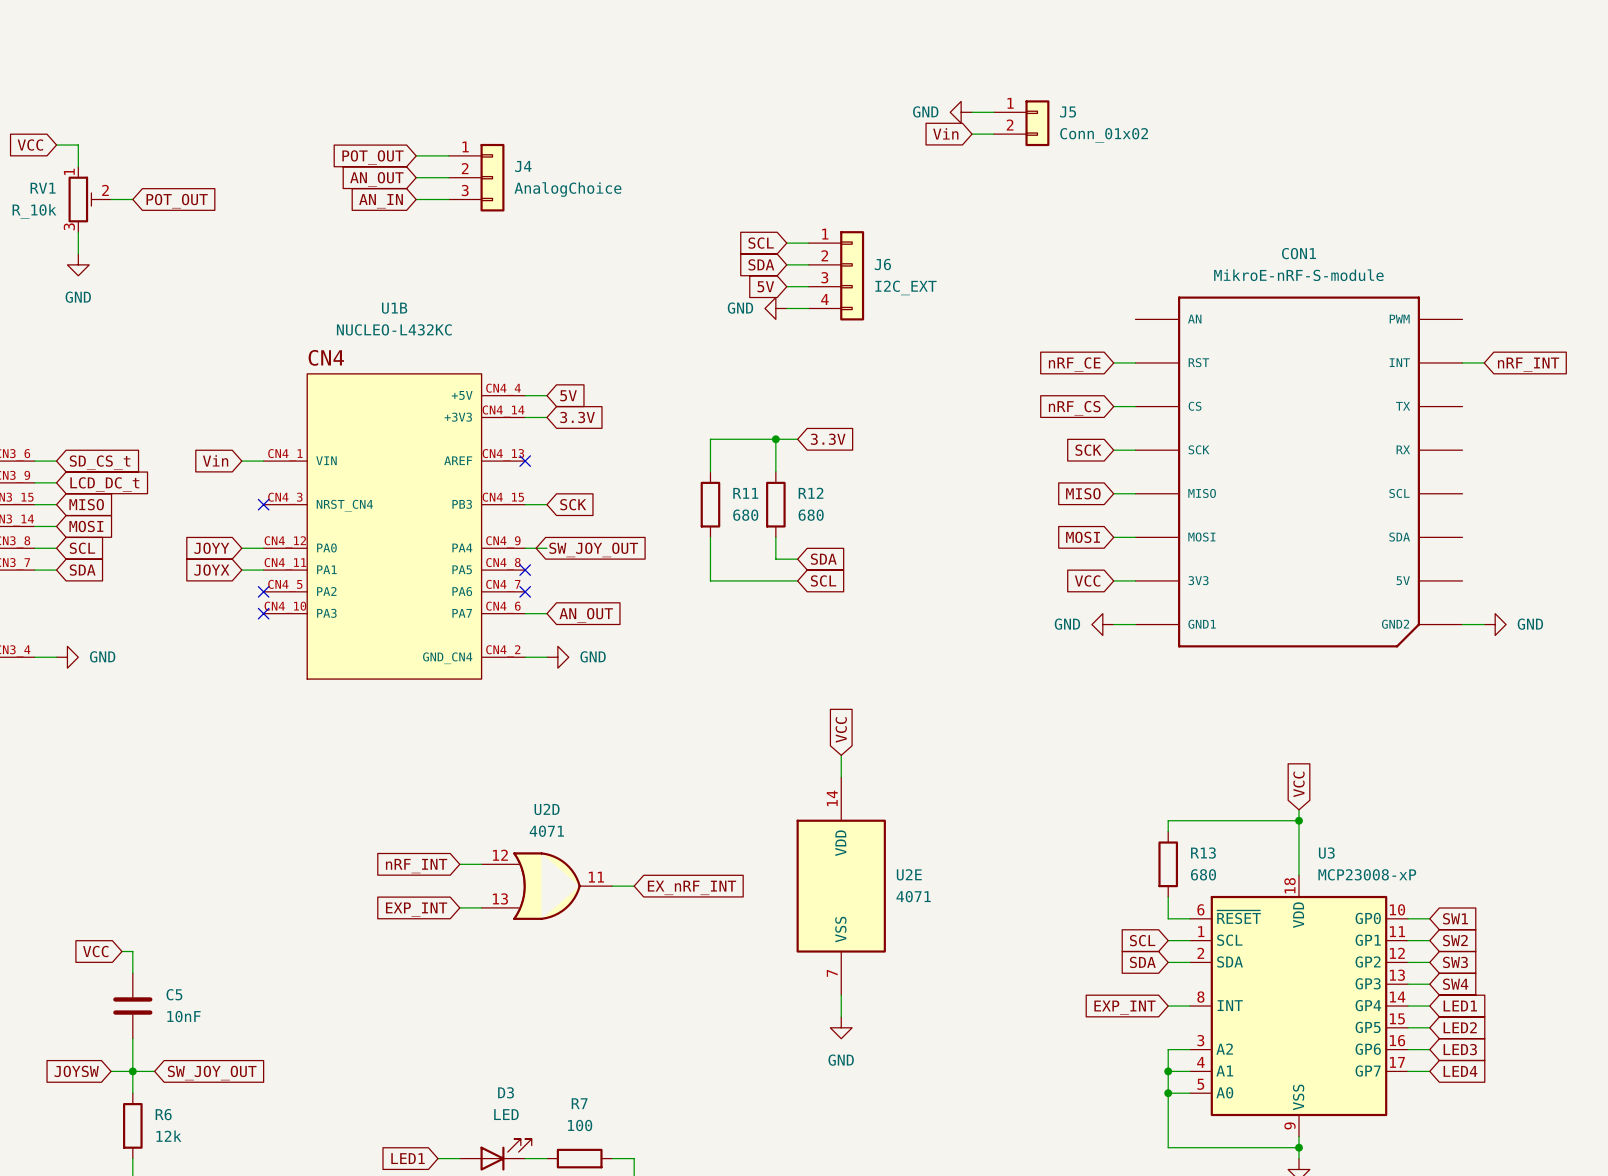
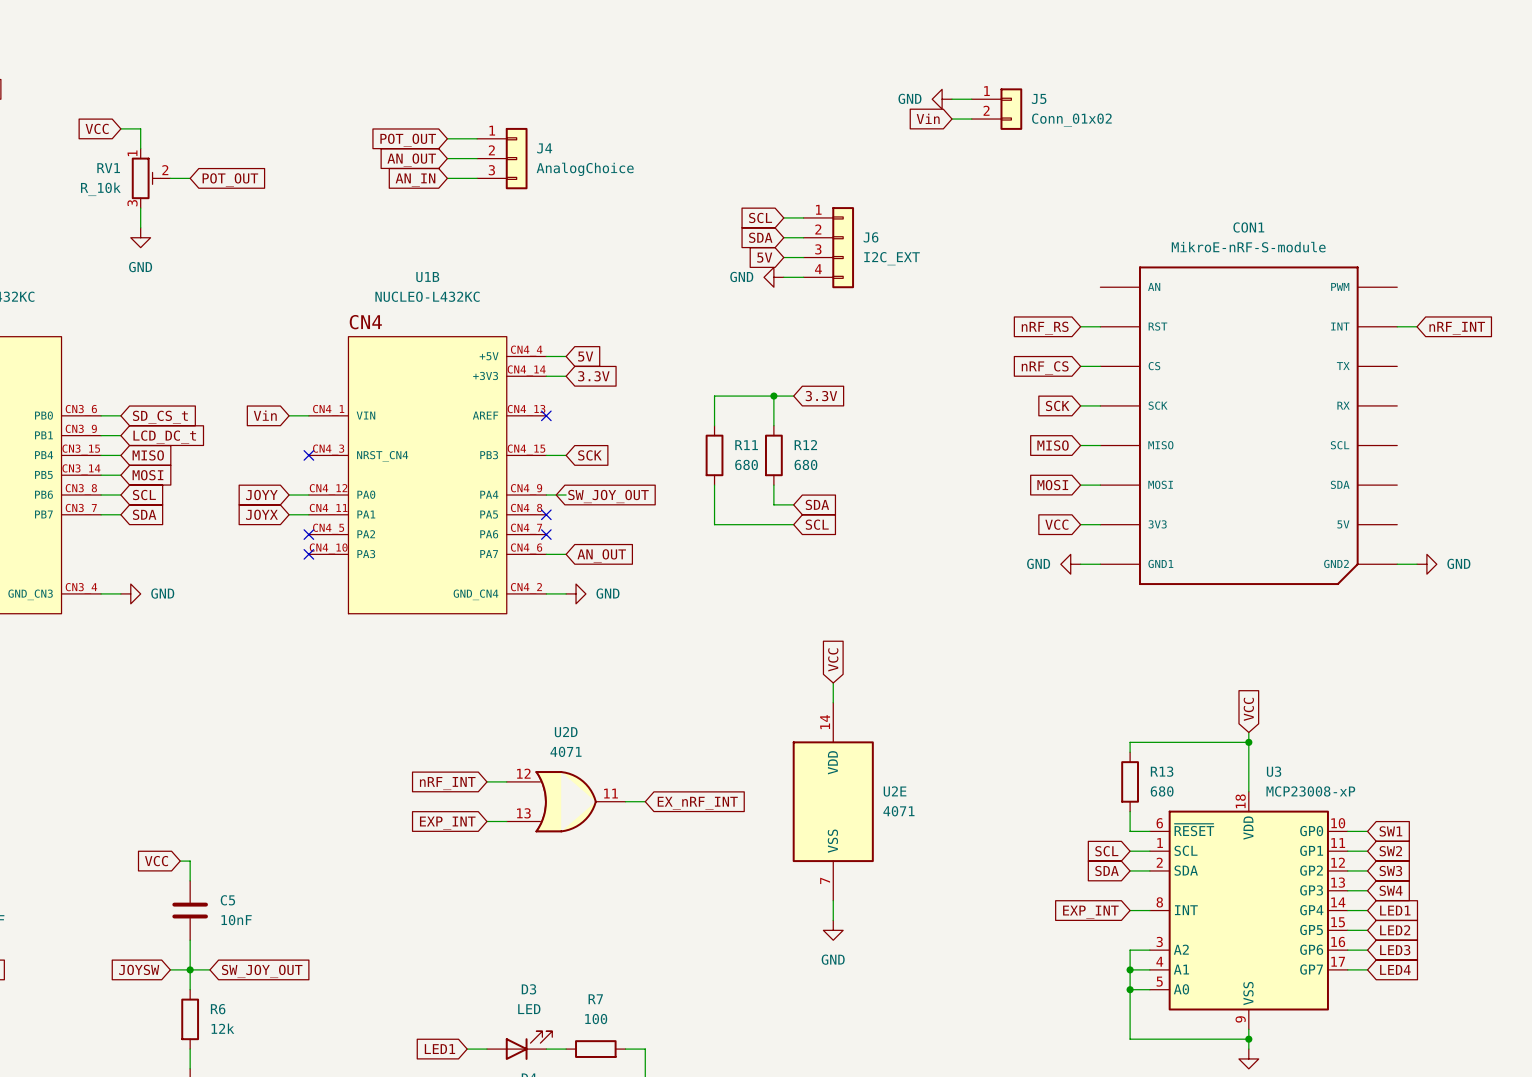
global label: nRF_CE (1074, 364) -> nRF_RS (1045, 328)

